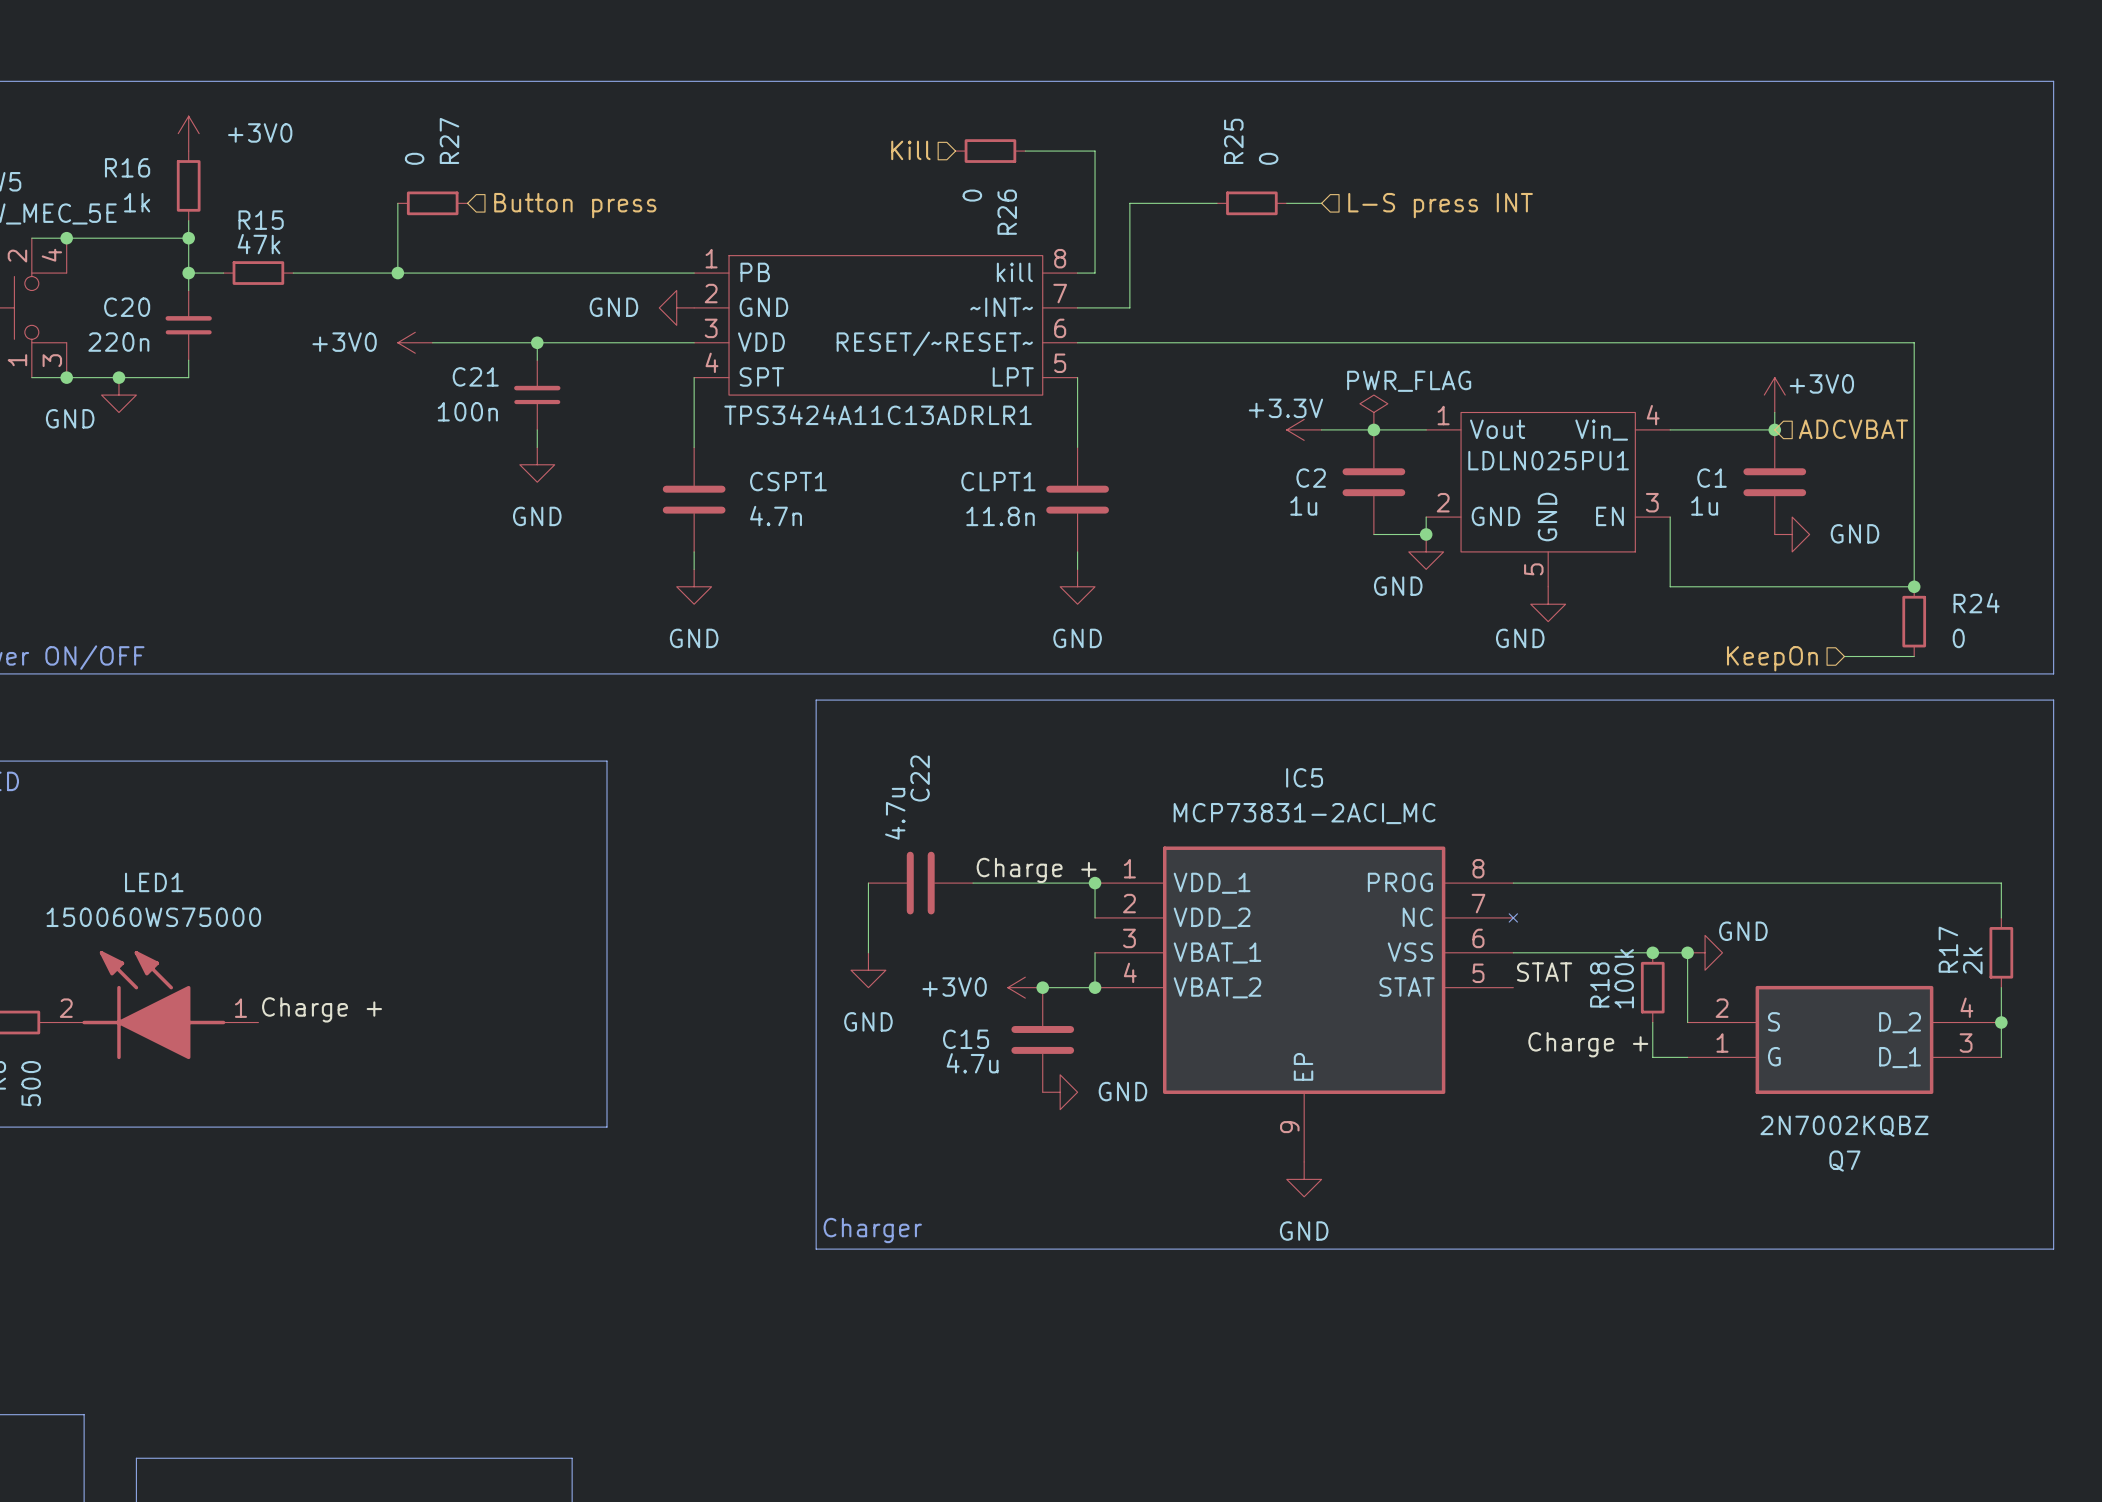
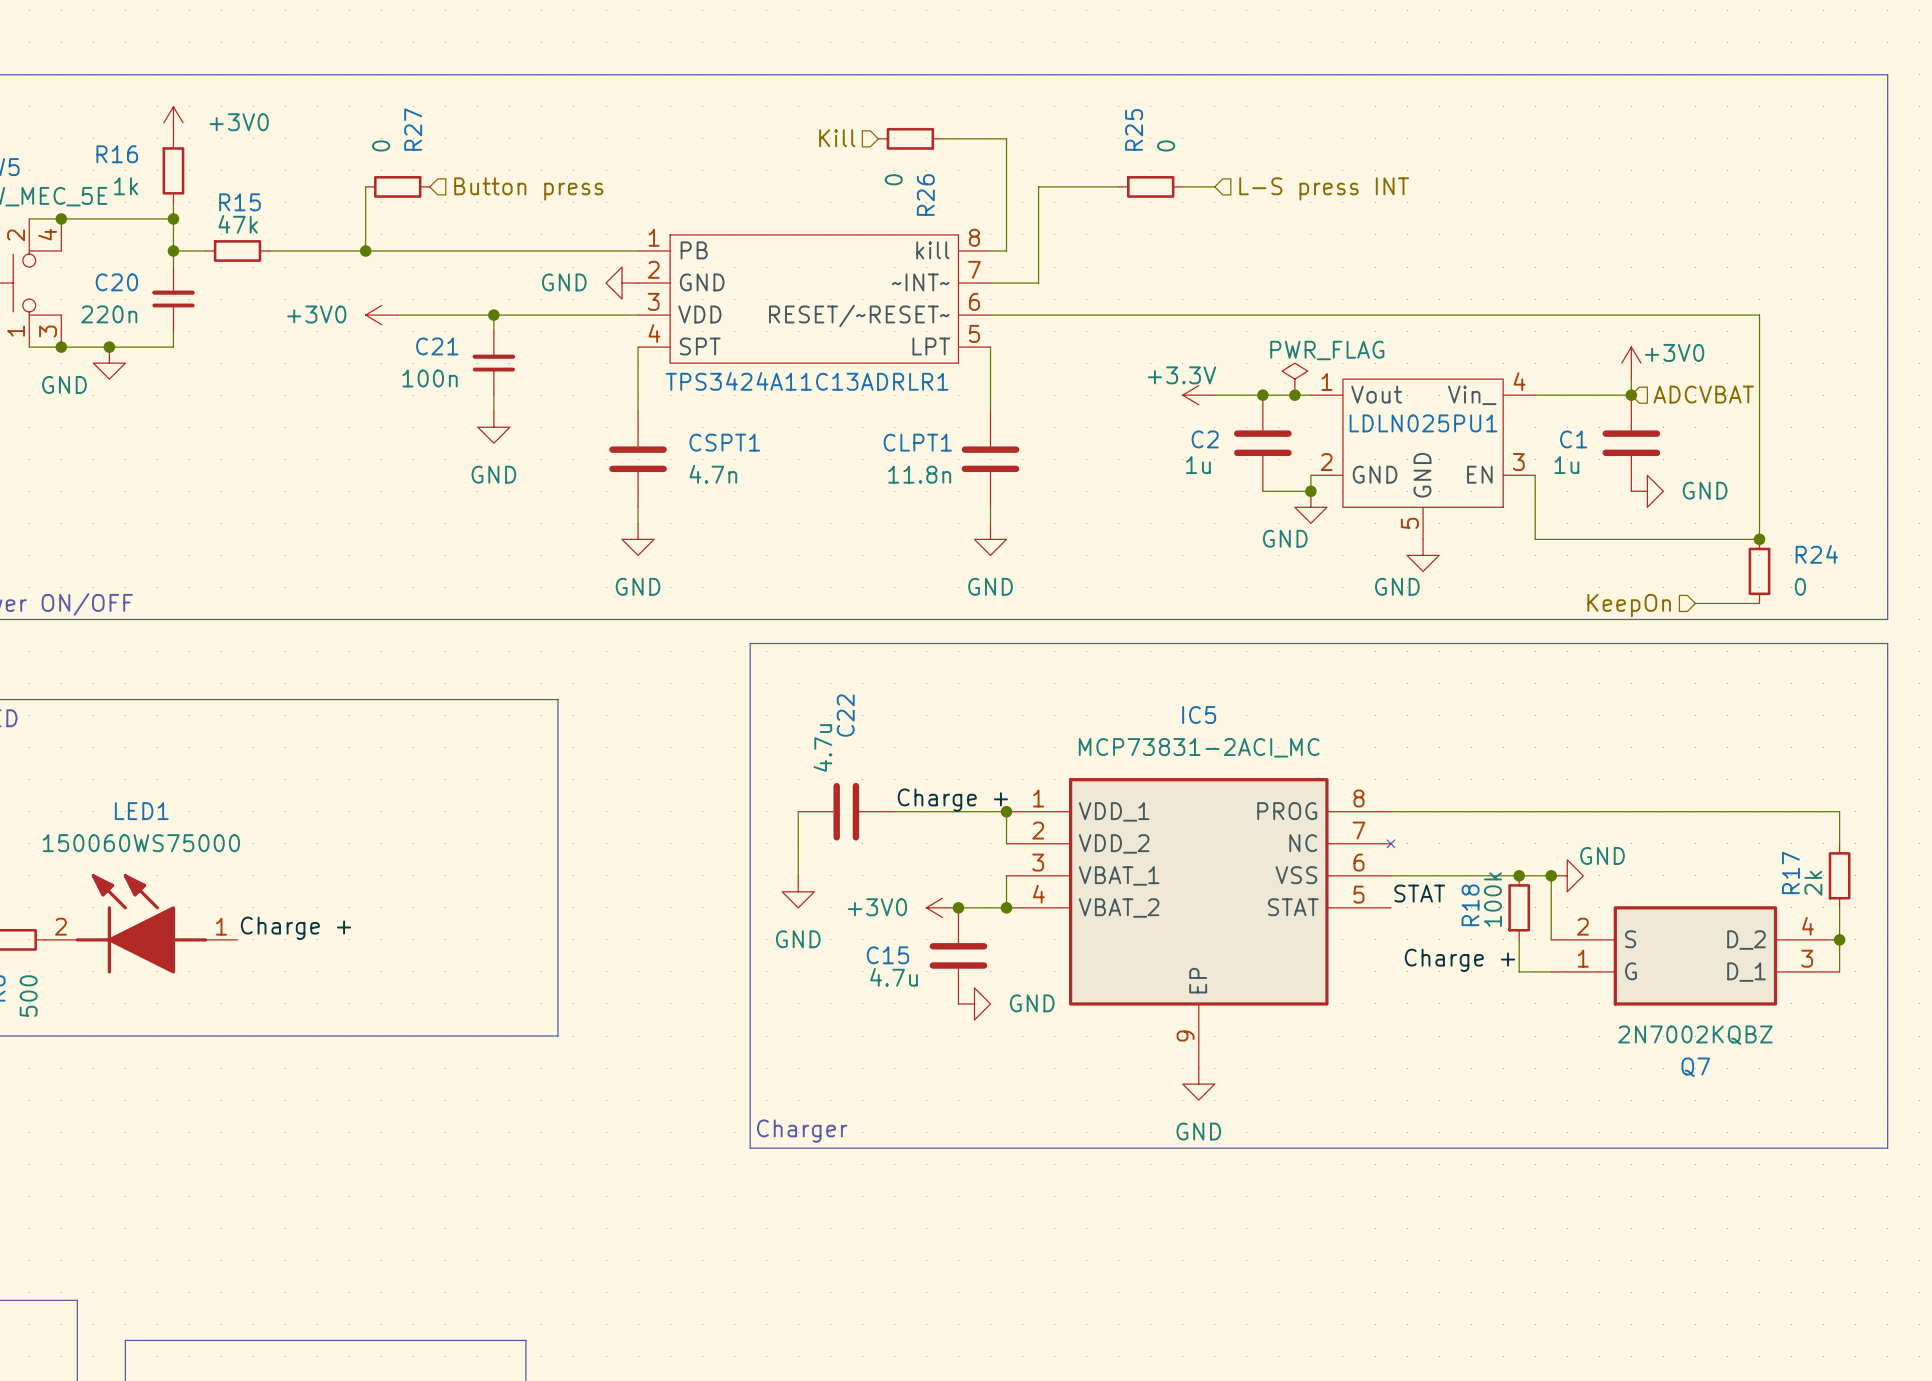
power symbol position: PWR_FLAG (1373, 412) -> PWR_FLAG (1294, 379)
junction: none -> (1294, 395)

